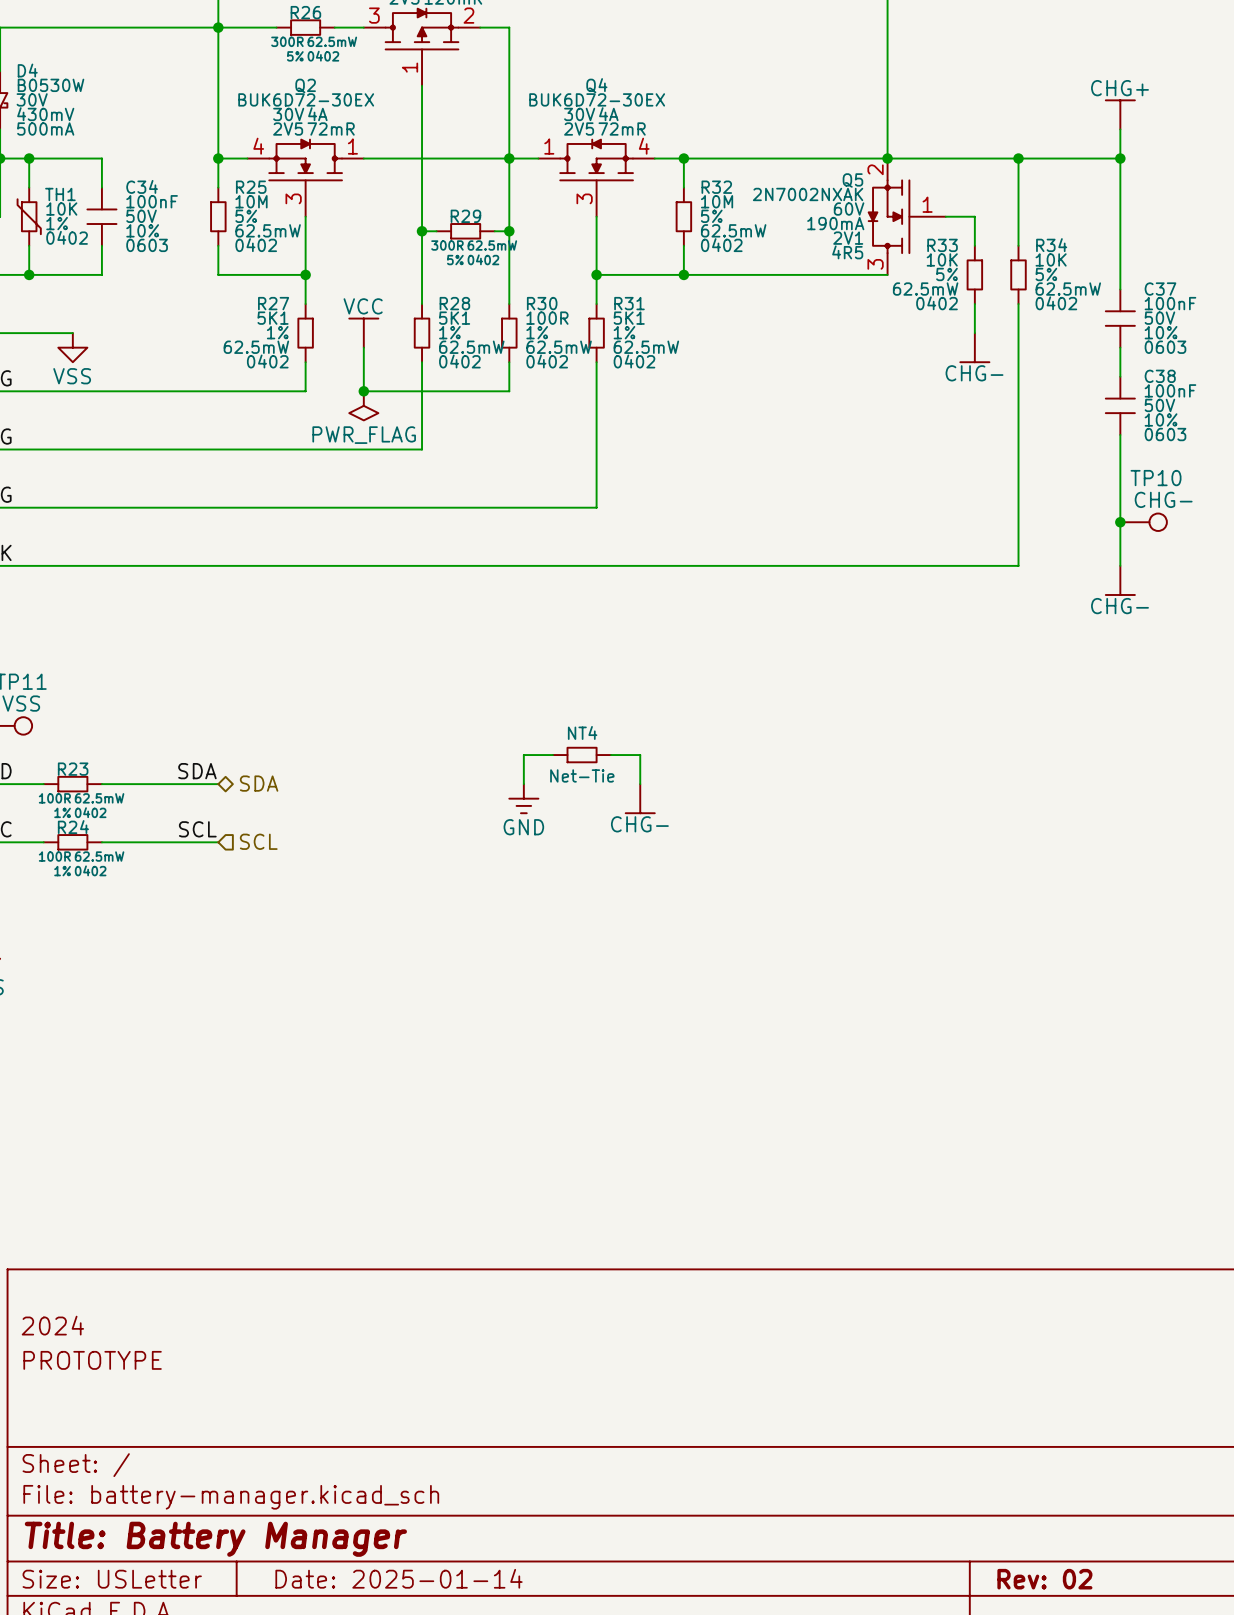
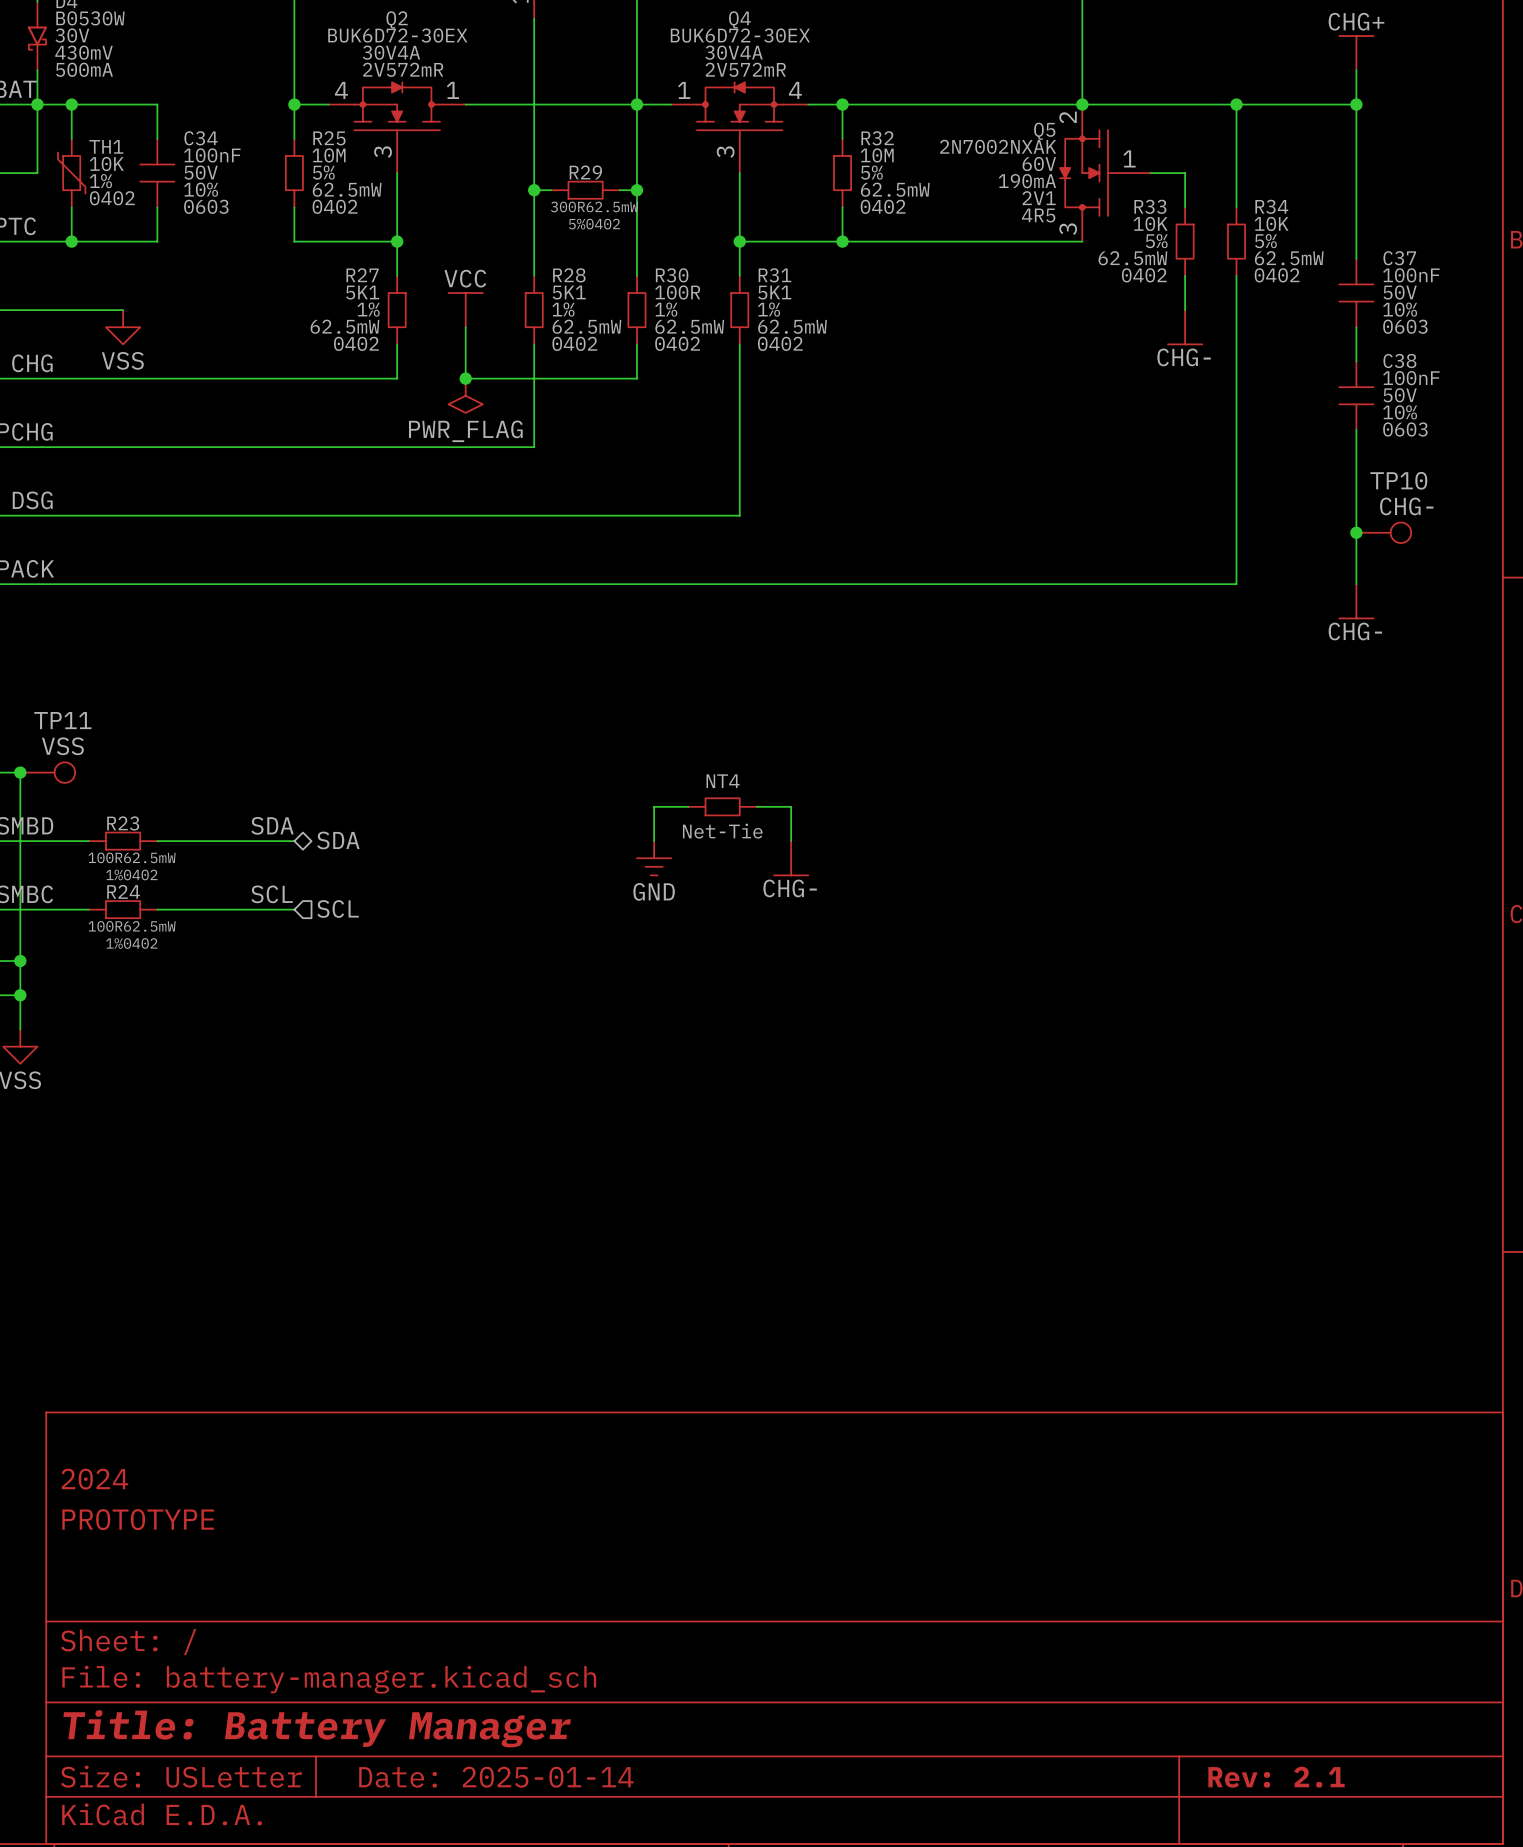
title block: Rev: 02 (1044, 1579) -> Rev: 2.1 (1276, 1777)

